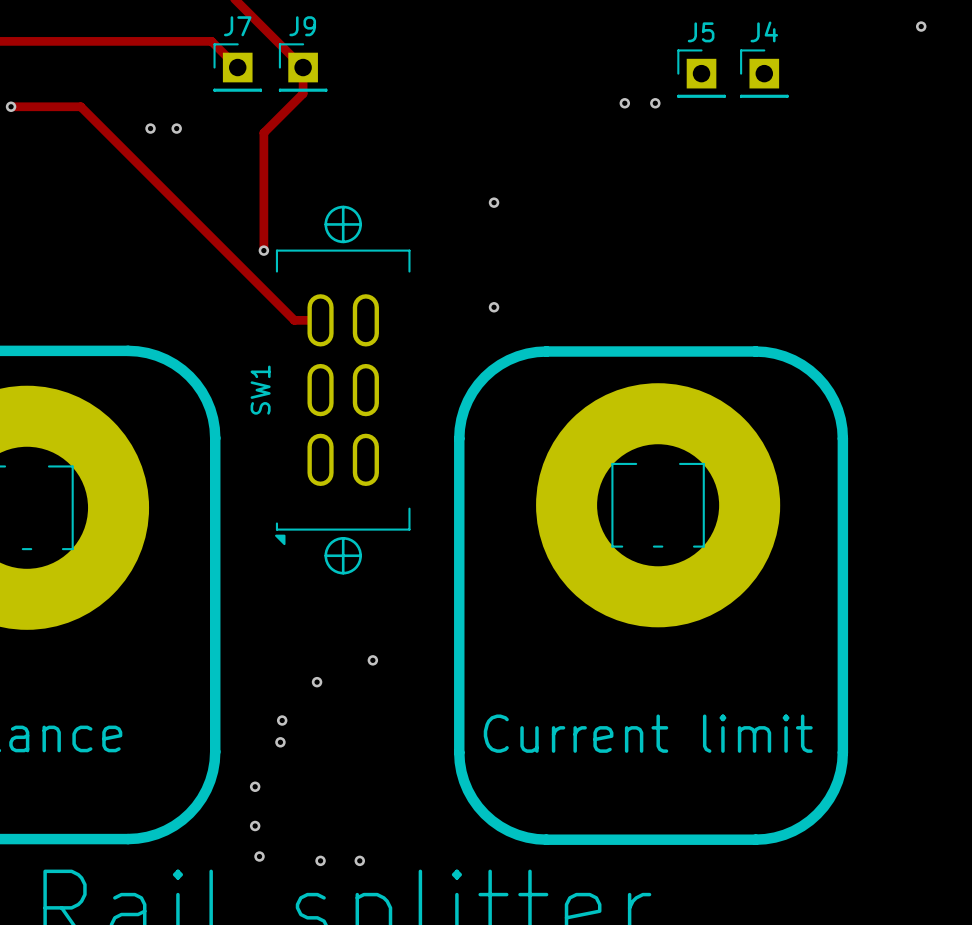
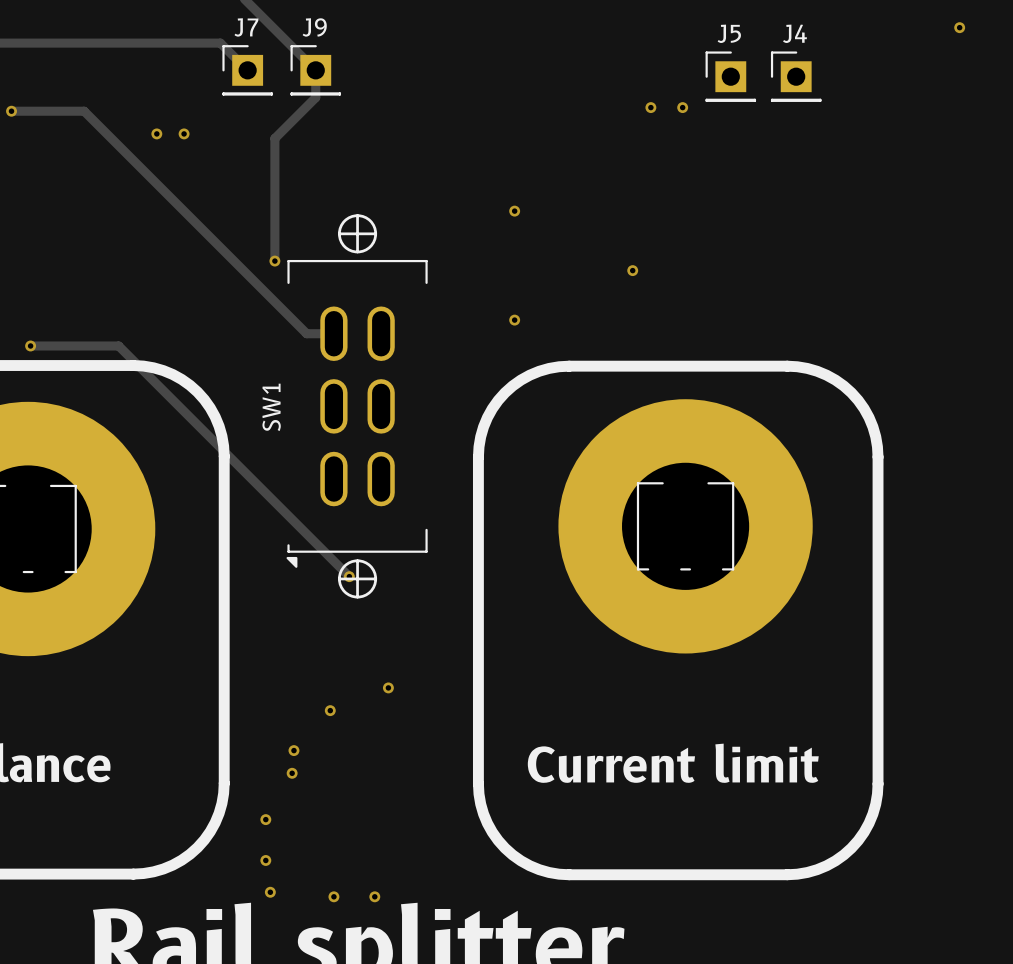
via: none -> (632, 270)
track: none -> (30, 345) (118, 345) (349, 576)
via: none -> (30, 345)
via: none -> (349, 576)

